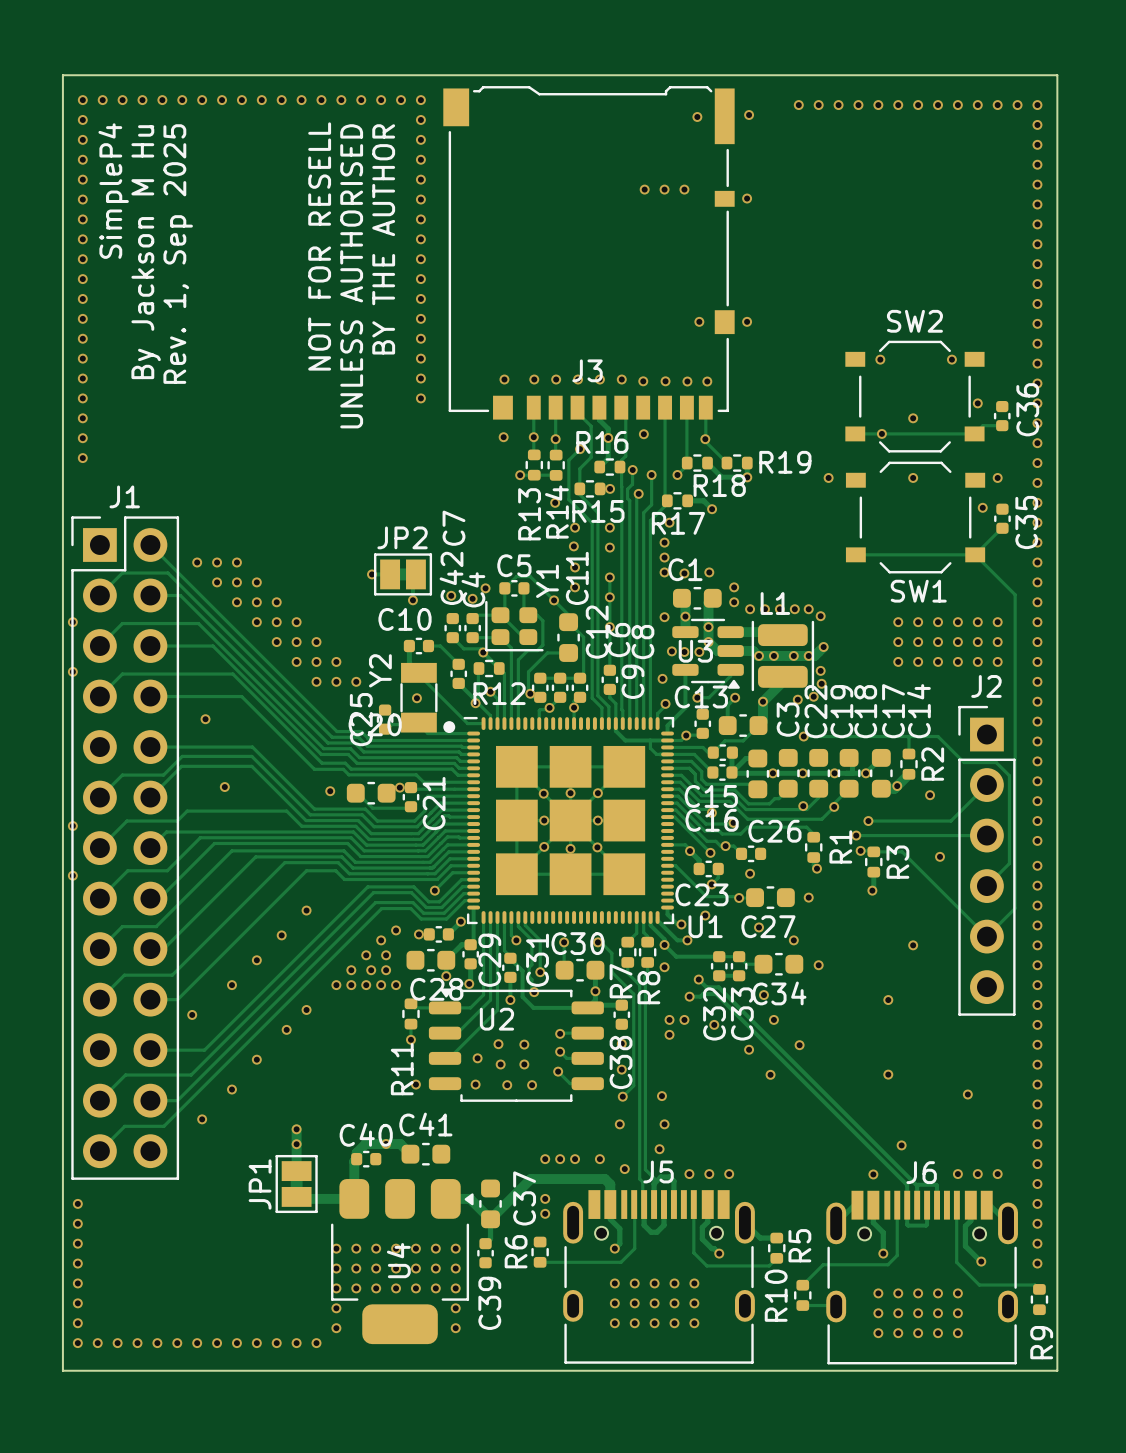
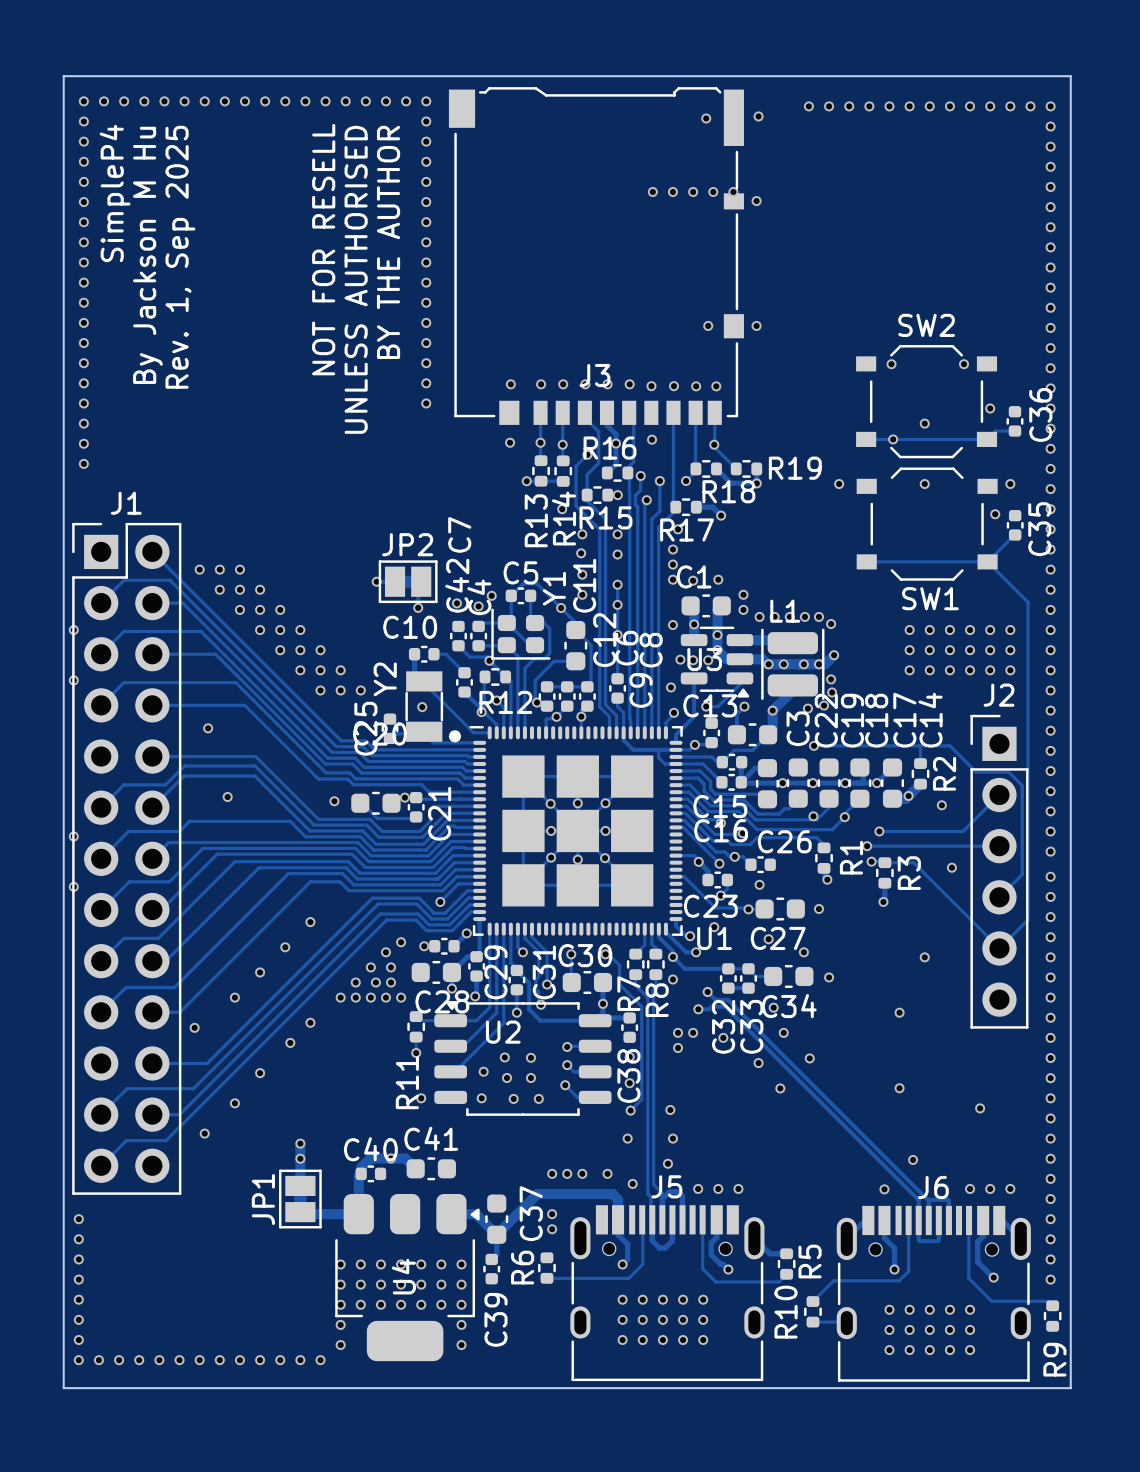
via: none -> (713, 191)
via: none -> (733, 191)

